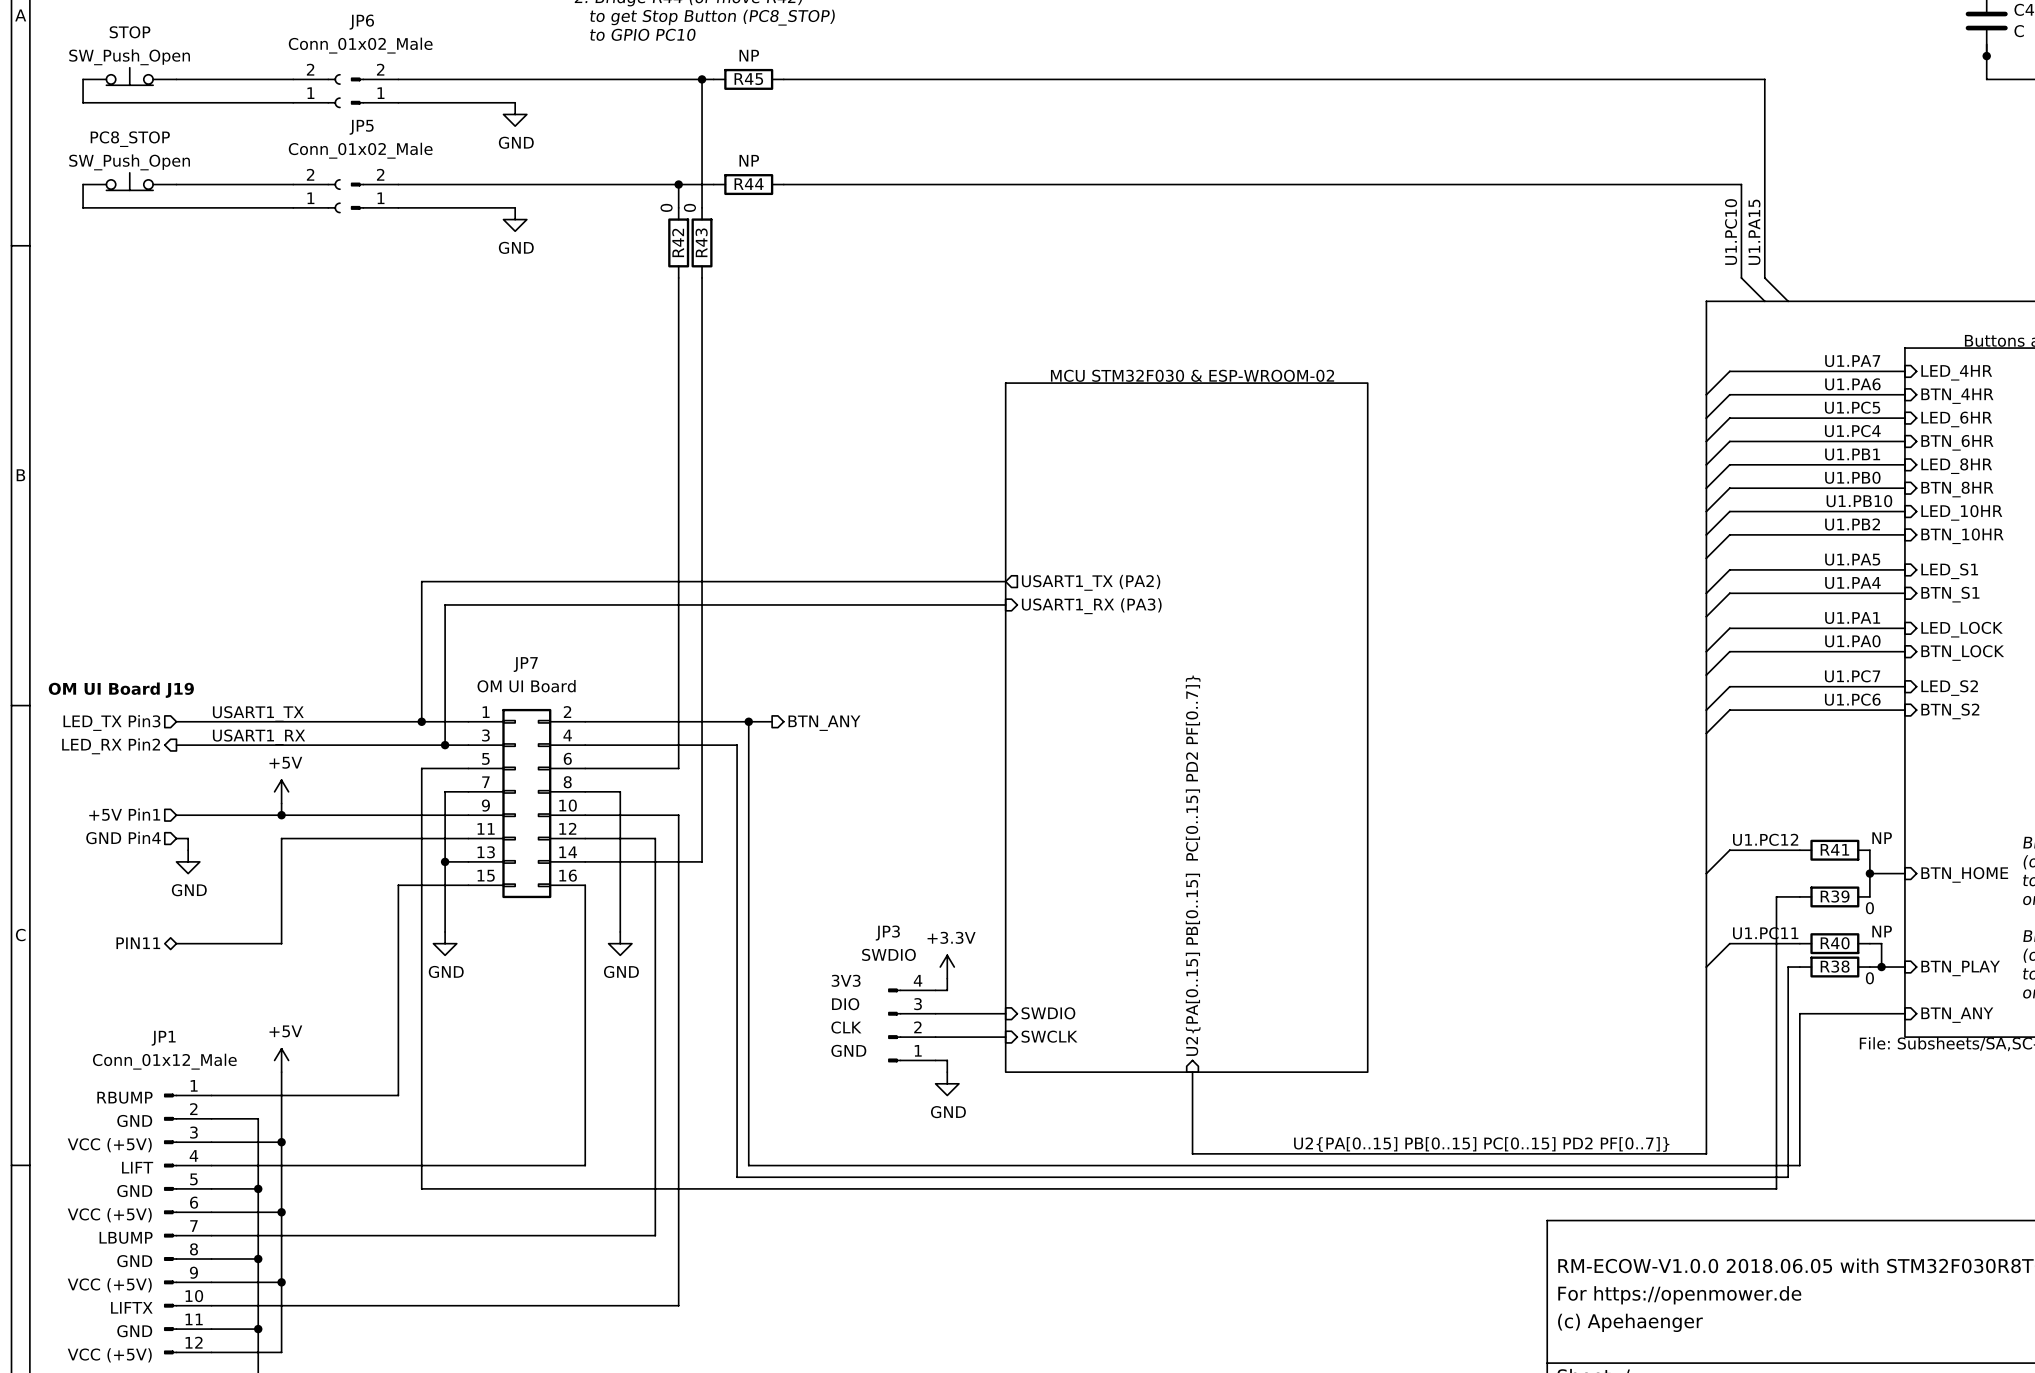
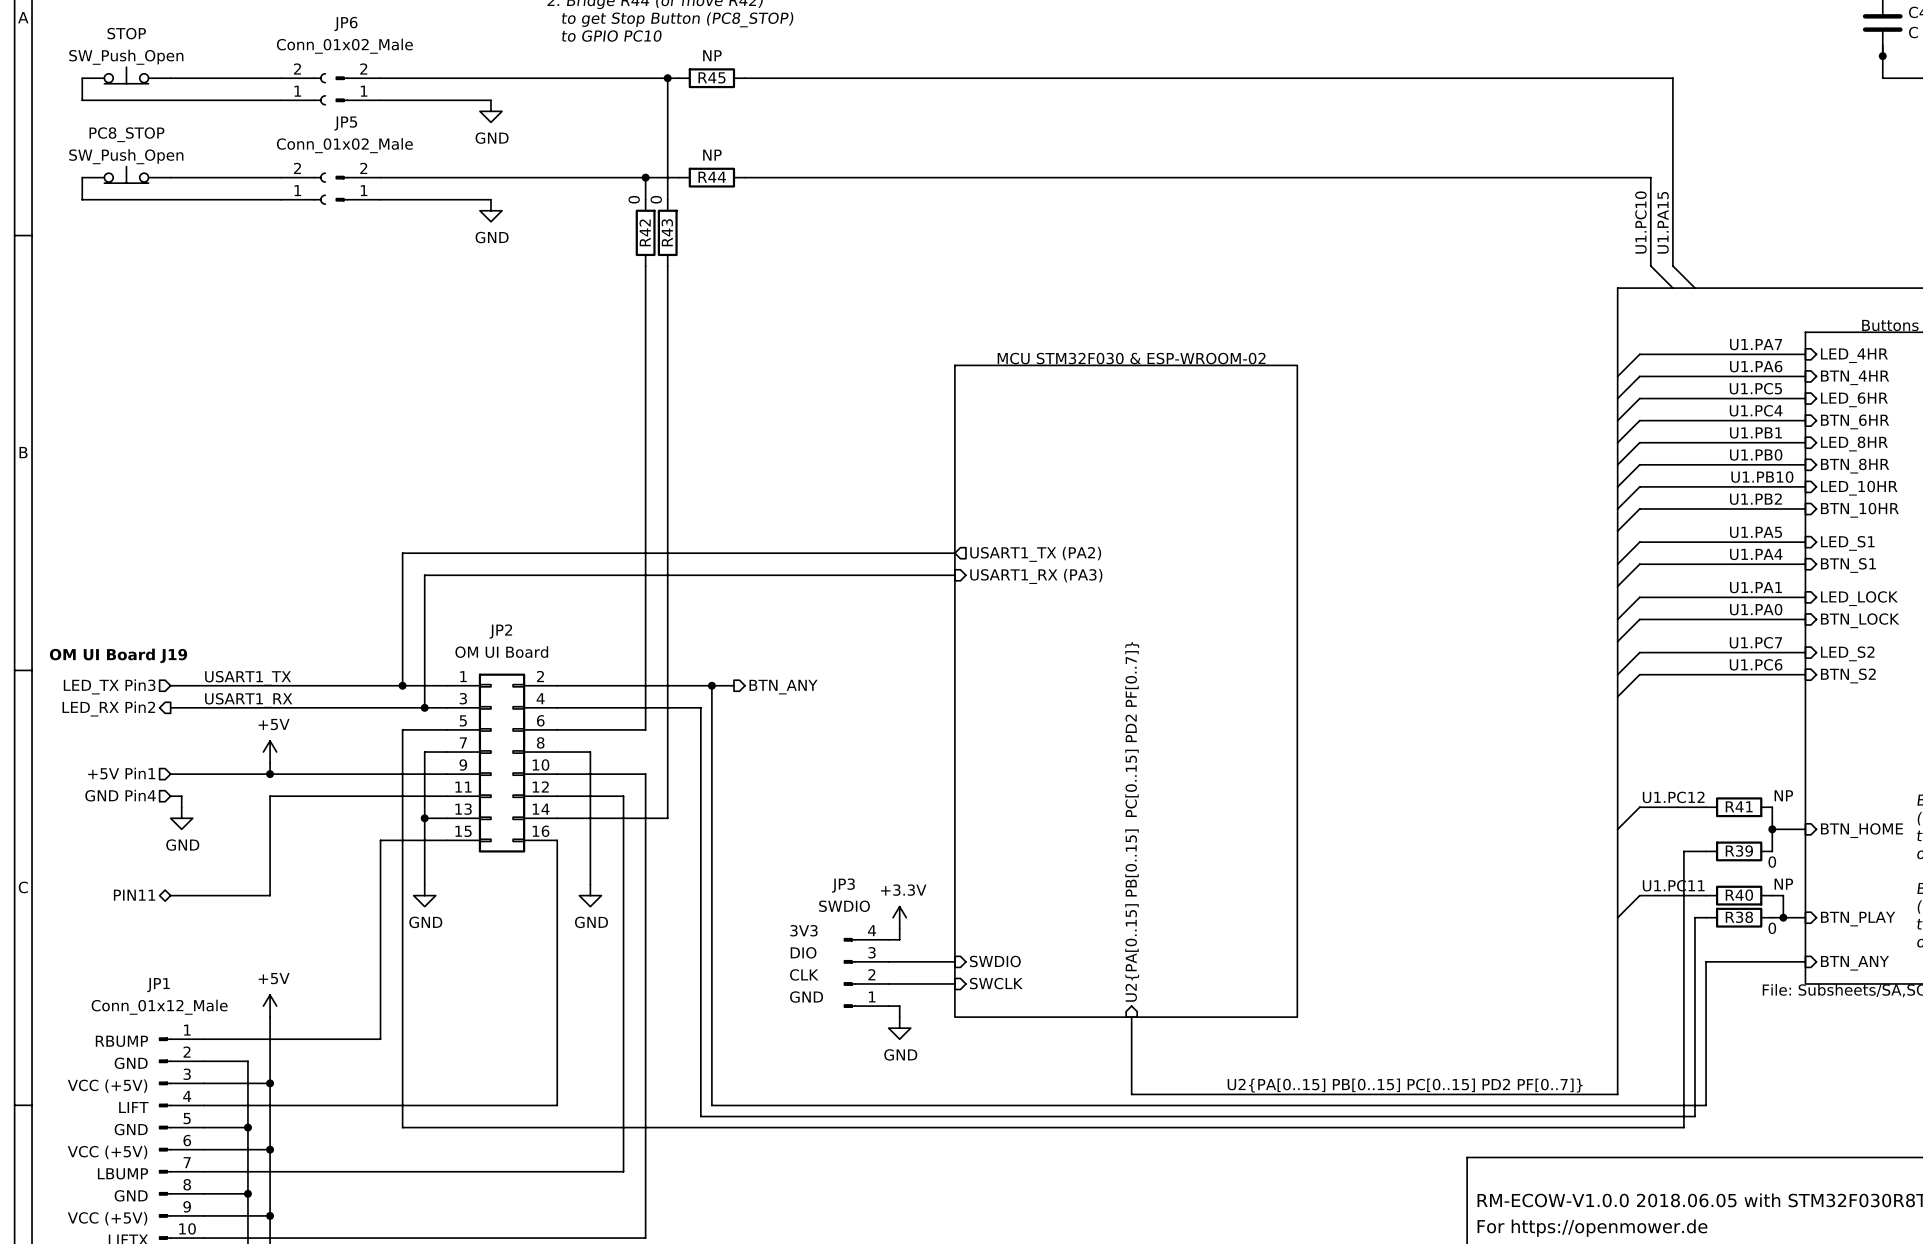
JP7 name: JP7 (525, 664) -> JP2 (500, 631)

